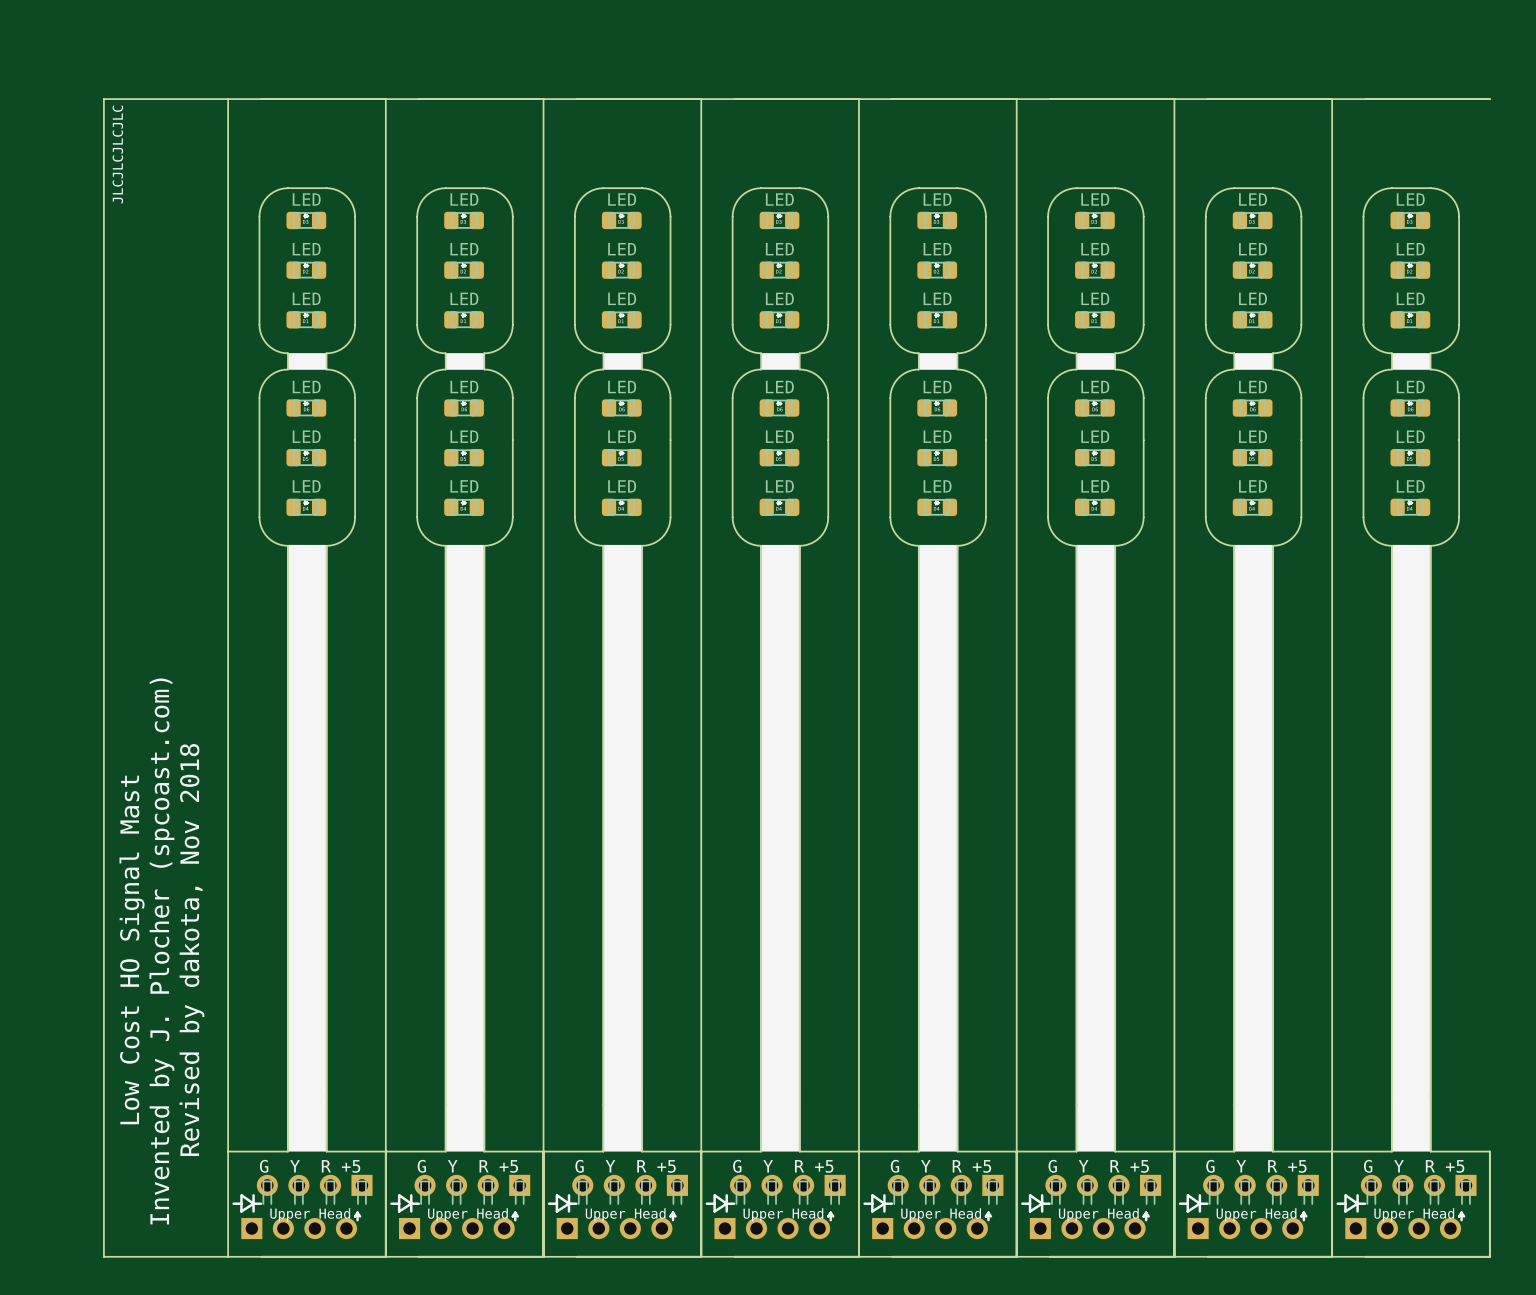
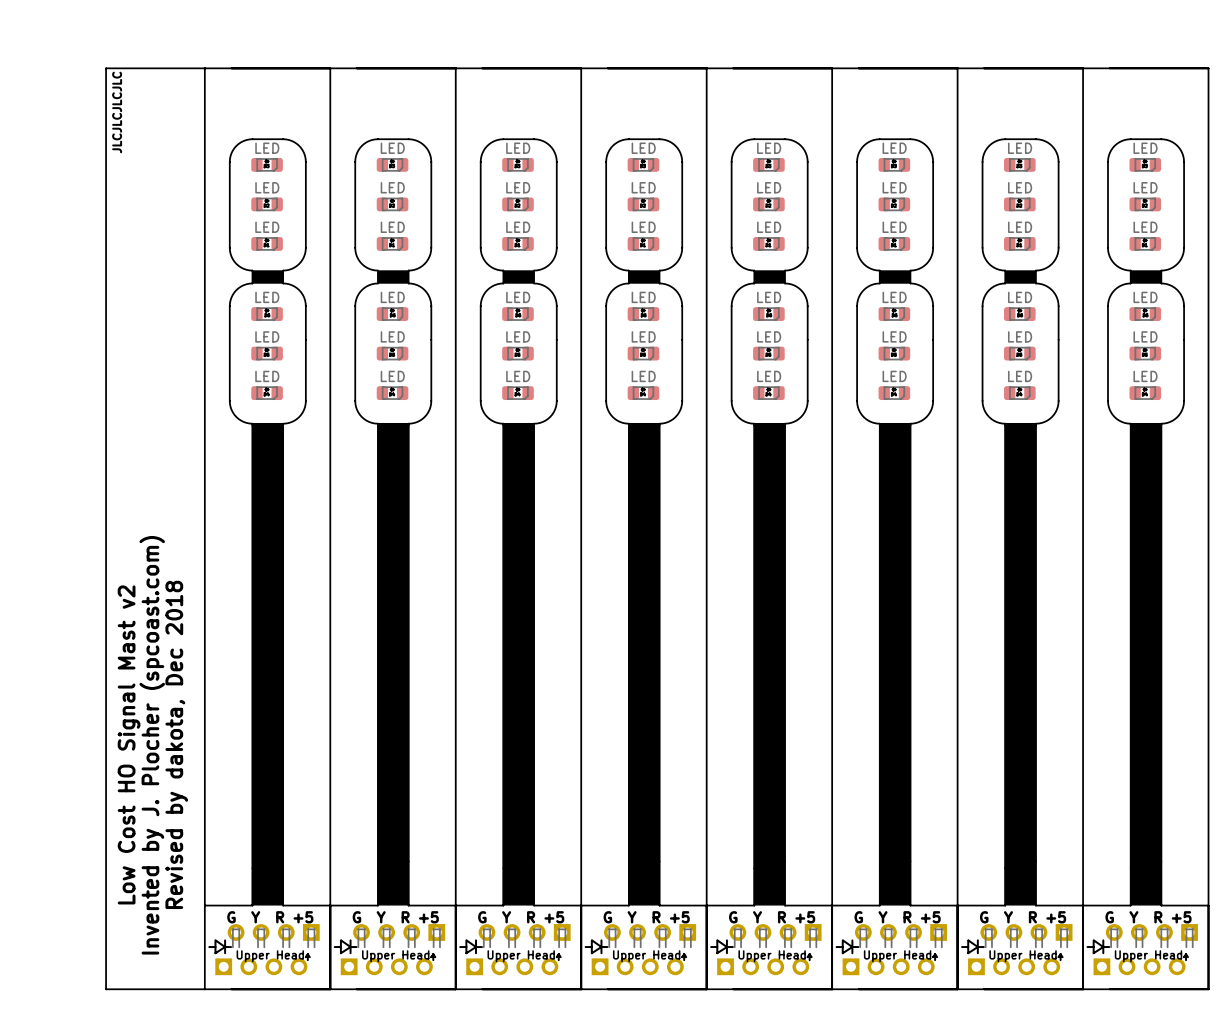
board edge: none -> (1208, 68) (1208, 905)
text: Low Cost HO Signal Mast (132, 949) -> Low Cost HO Signal Mast v2 (129, 744)
text: Revised by dakota, Nov 2018 (191, 949) -> Revised by dakota, Dec 2018 (176, 744)

